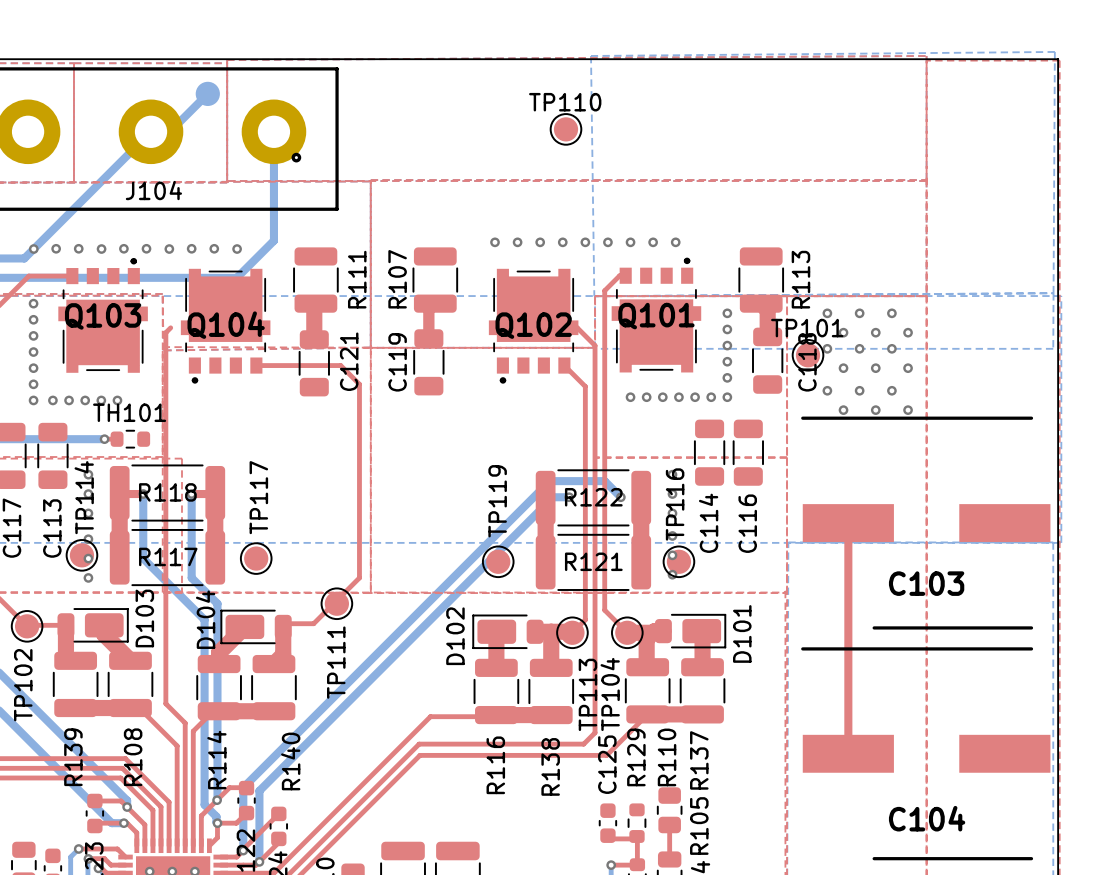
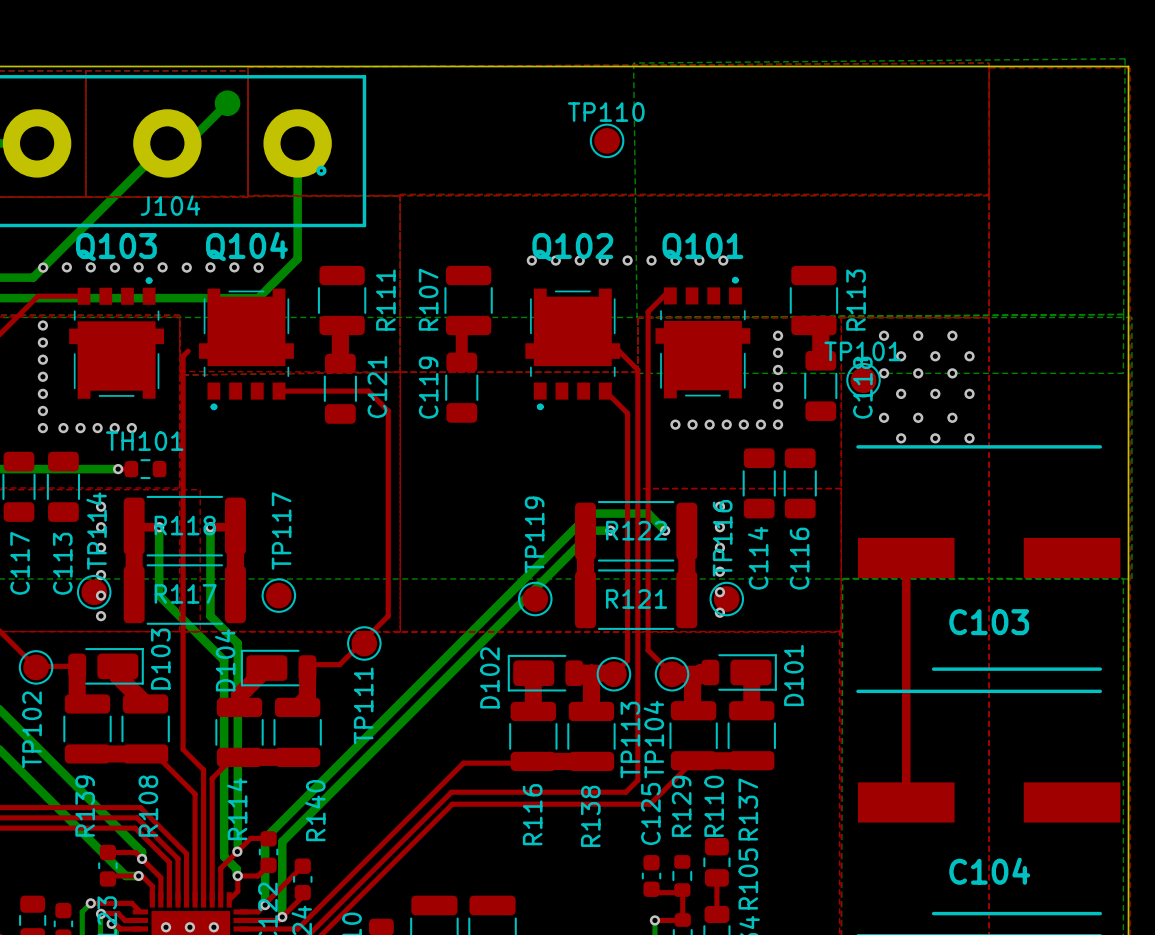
Q103 name position: Q103 (103, 316) -> Q103 (116, 247)
Q101 name position: Q101 (656, 316) -> Q101 (702, 247)
Q104 name position: Q104 (226, 325) -> Q104 (246, 246)
Q102 name position: Q102 (533, 325) -> Q102 (572, 247)

